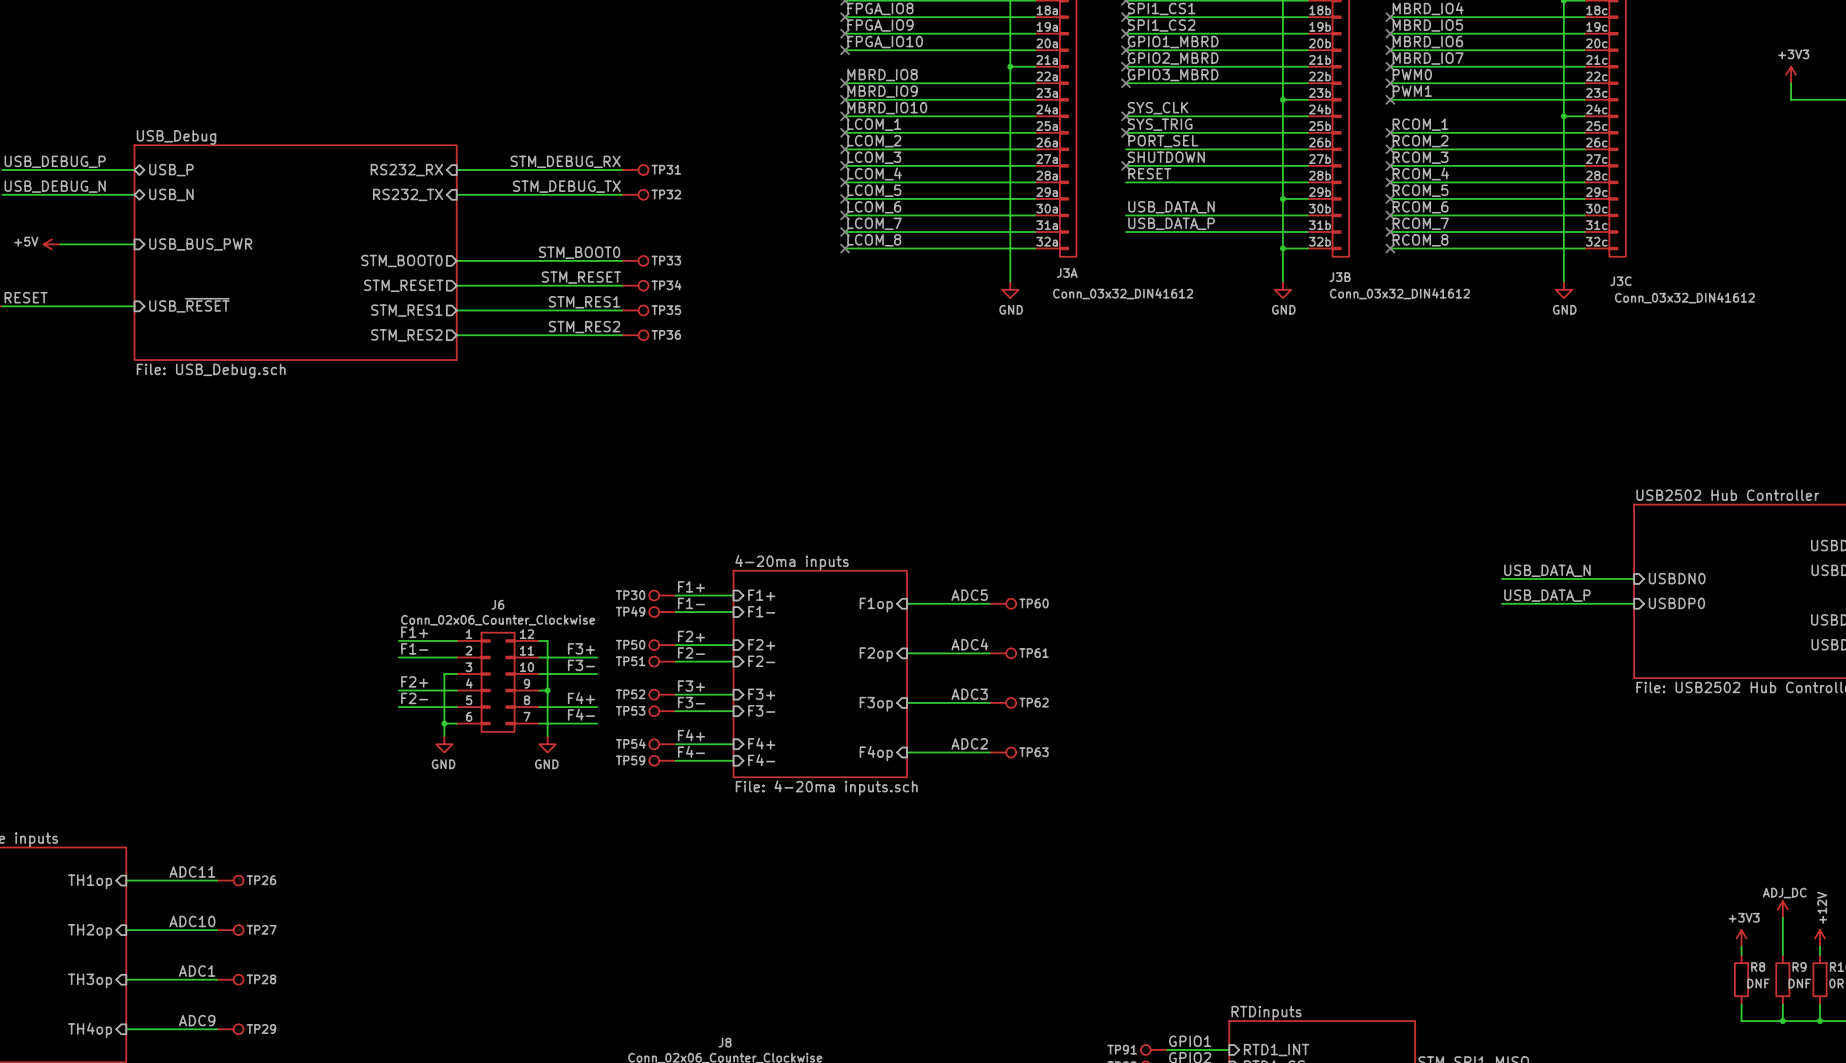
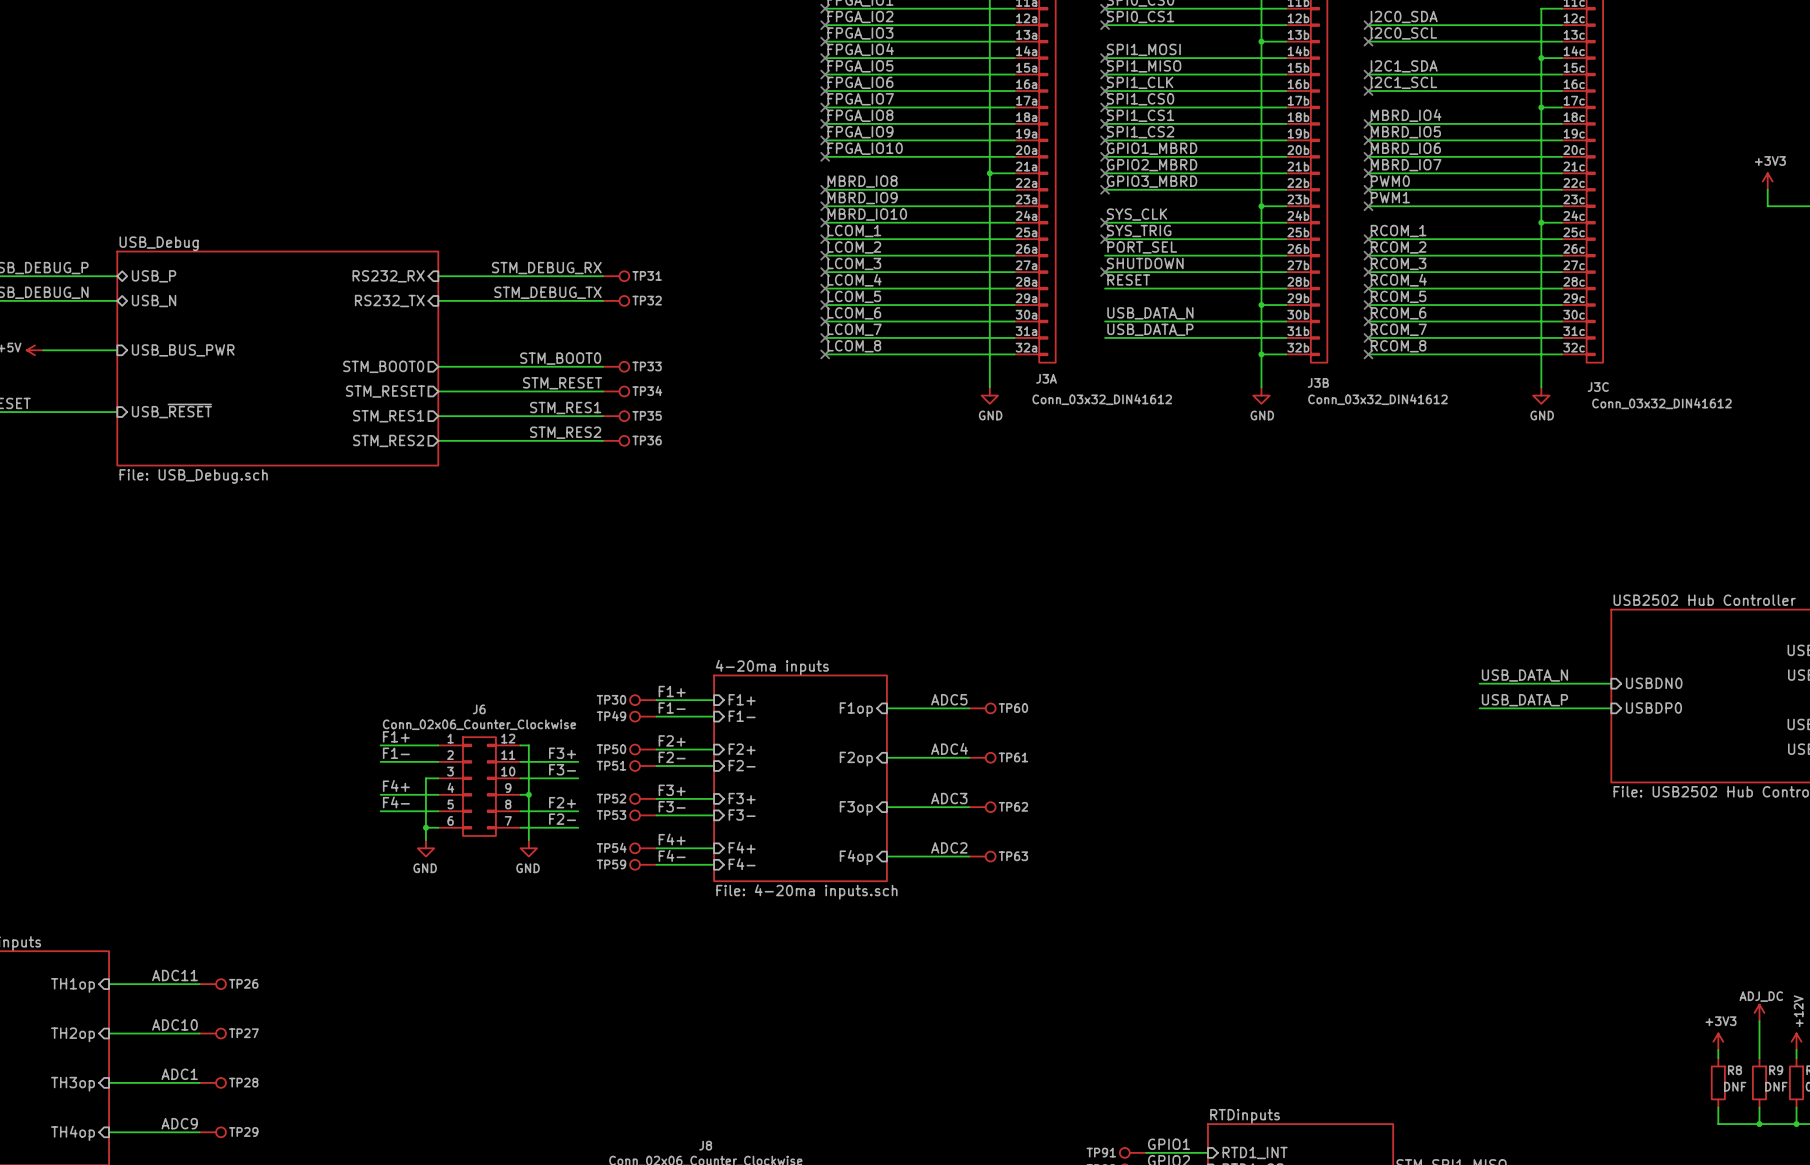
label: F2+ (414, 681) -> F4+ (396, 785)
label: F2- (414, 698) -> F4- (396, 802)
label: F4+ (581, 698) -> F2+ (562, 802)
label: F4- (581, 714) -> F2- (562, 819)

